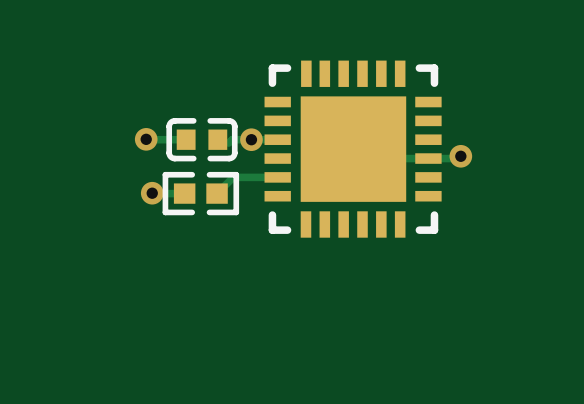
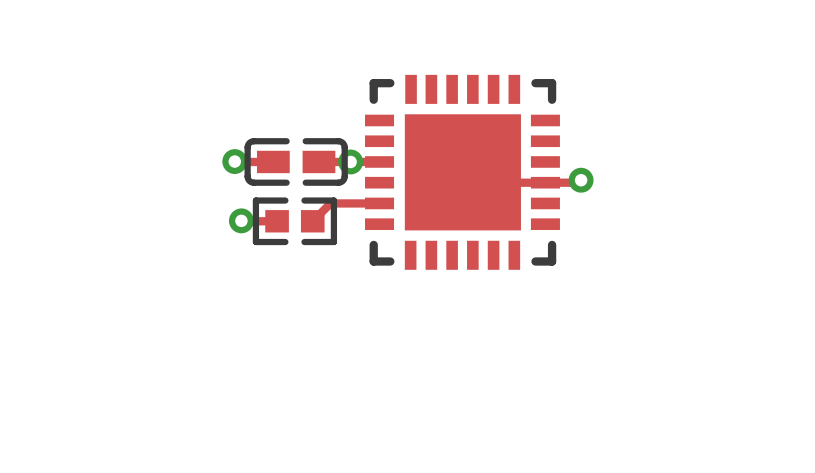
part footprint: [166, 118, 238, 162] -> [244, 138, 348, 186]

